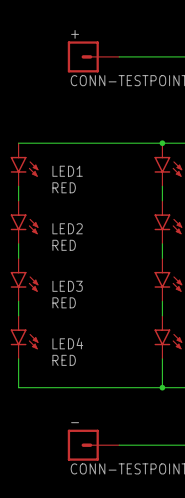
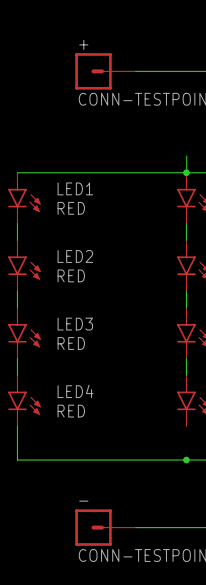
wire: none -> (186, 155) (186, 172)
LED1 name position: LED1 (67, 171) -> LED1 (75, 188)
LED1 value position: RED (64, 187) -> RED (71, 208)
LED2 name position: LED2 (67, 228) -> LED2 (75, 256)
LED2 value position: RED (64, 245) -> RED (71, 275)
LED3 name position: LED3 (67, 286) -> LED3 (75, 324)
LED3 value position: RED (64, 302) -> RED (71, 343)
LED4 name position: LED4 (67, 343) -> LED4 (75, 391)
wire: (162, 358) (162, 387) -> none
LED4 value position: RED (64, 360) -> RED (71, 411)

